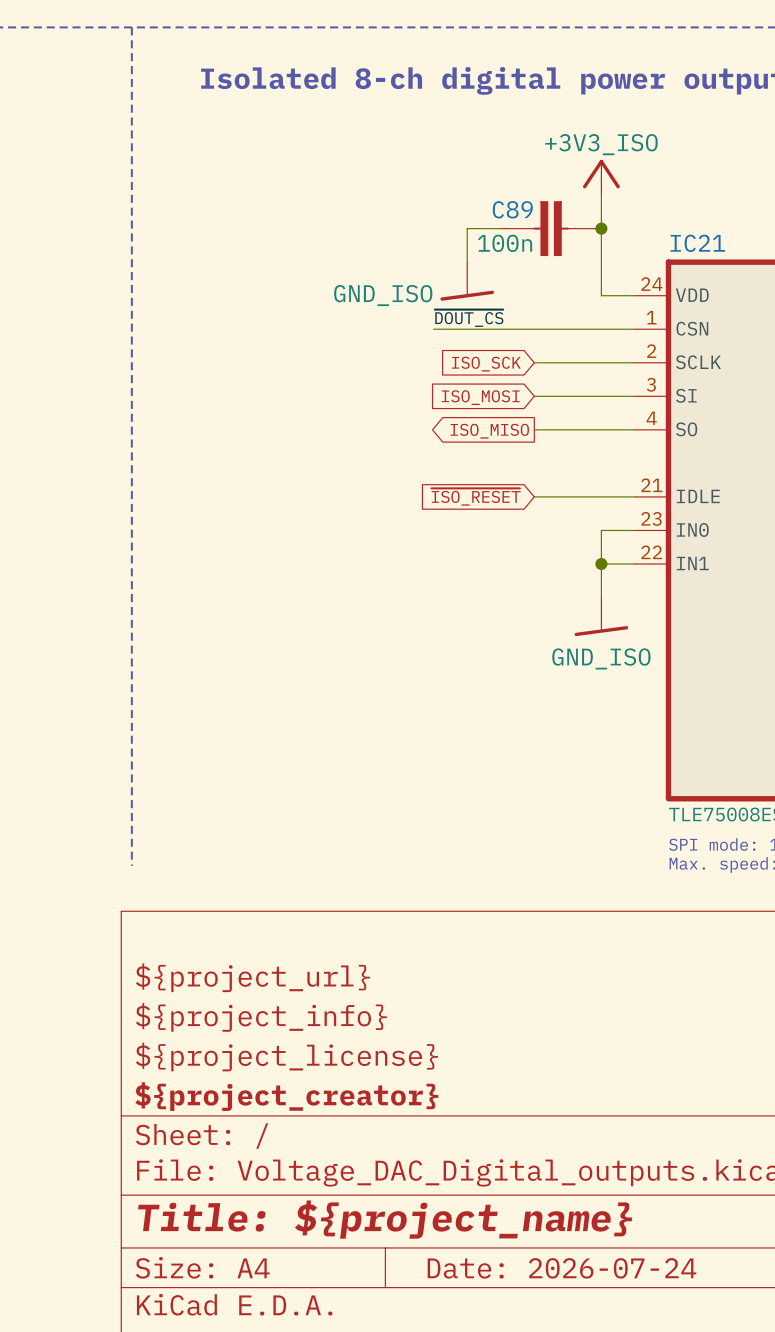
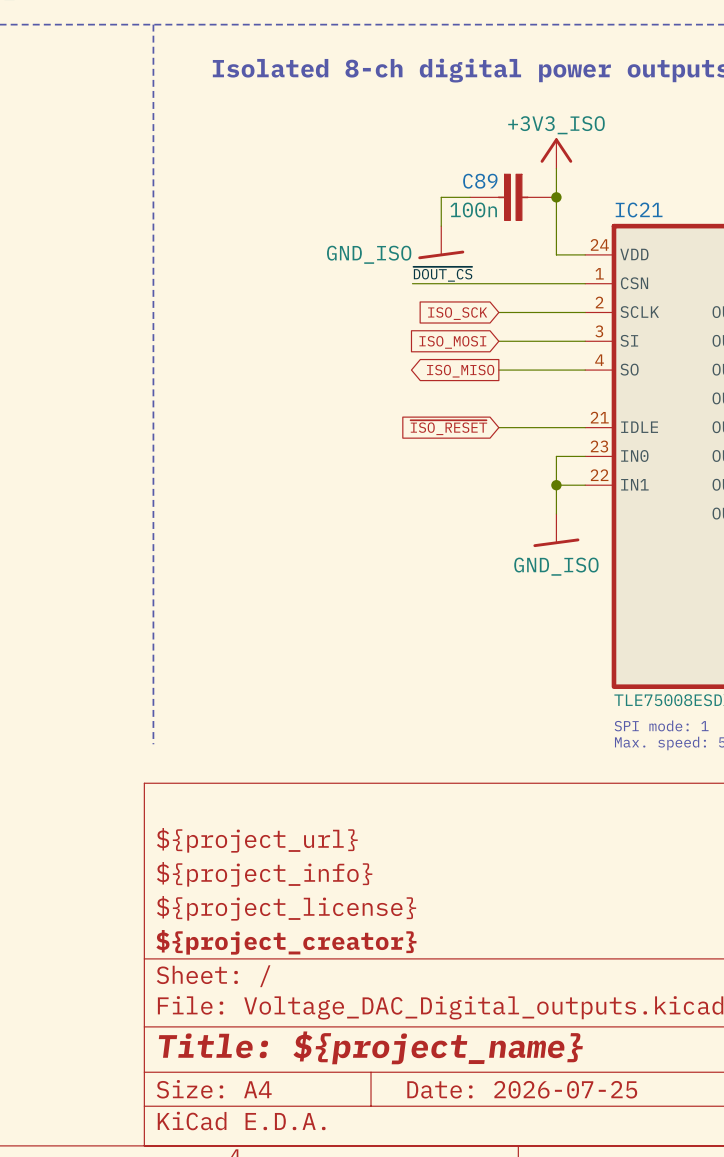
title block: Date: 2026-07-24 (562, 1268) -> Date: 2026-07-25 (522, 1089)

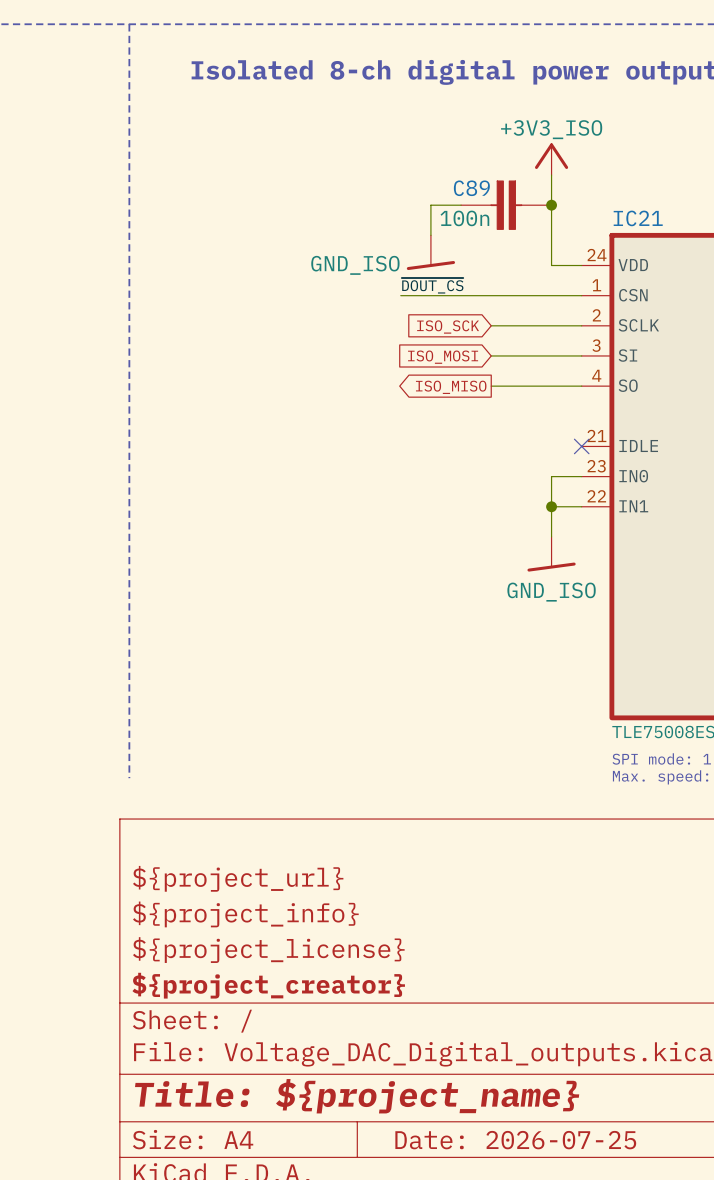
global label: ~{ISO_RESET} (448, 427) -> none
wire: (498, 427) (585, 427) -> none
no-connect mark: none -> (581, 446)

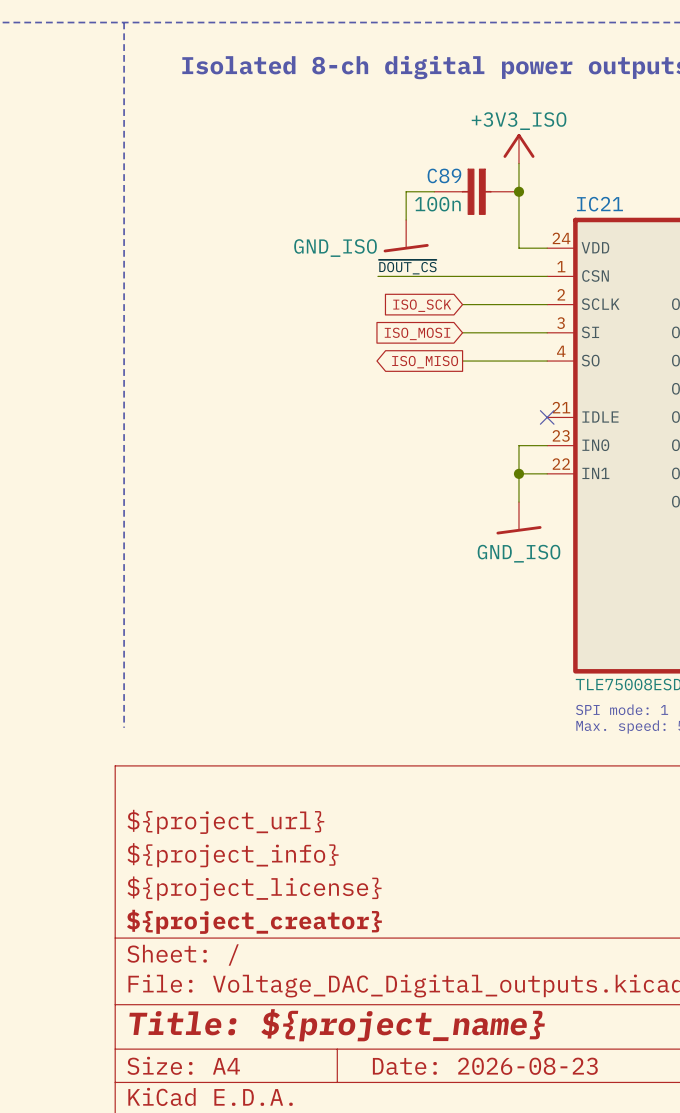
title block: Date: 2026-07-25 (515, 1140) -> Date: 2026-08-23 (485, 1066)

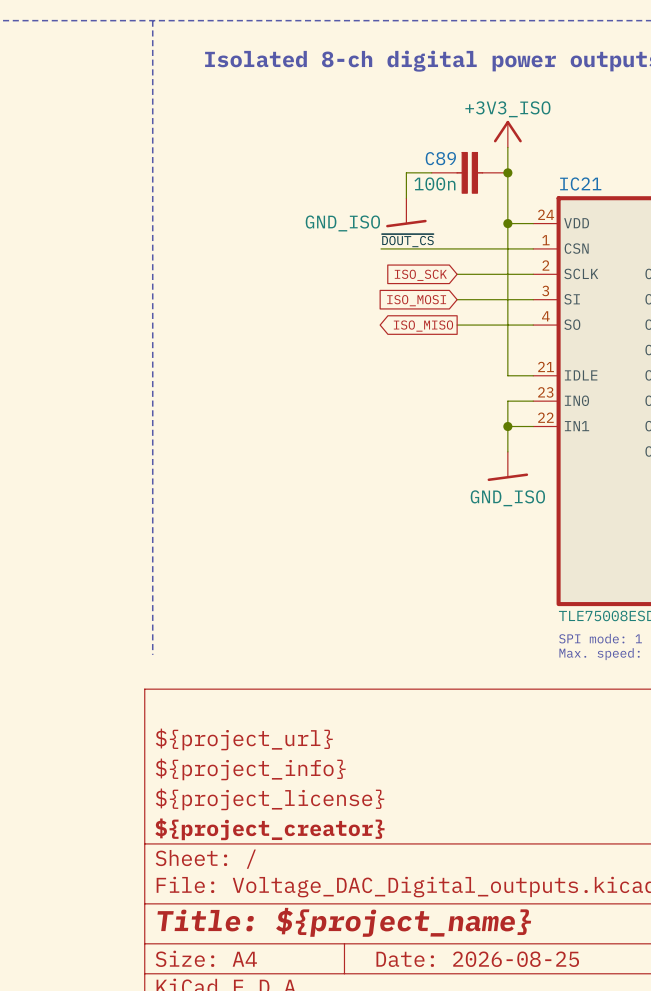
wire: none -> (507, 223) (507, 375) (533, 375)
junction: none -> (507, 223)
no-connect mark: (547, 417) -> none
title block: Date: 2026-08-23 (485, 1066) -> Date: 2026-08-25 (477, 959)

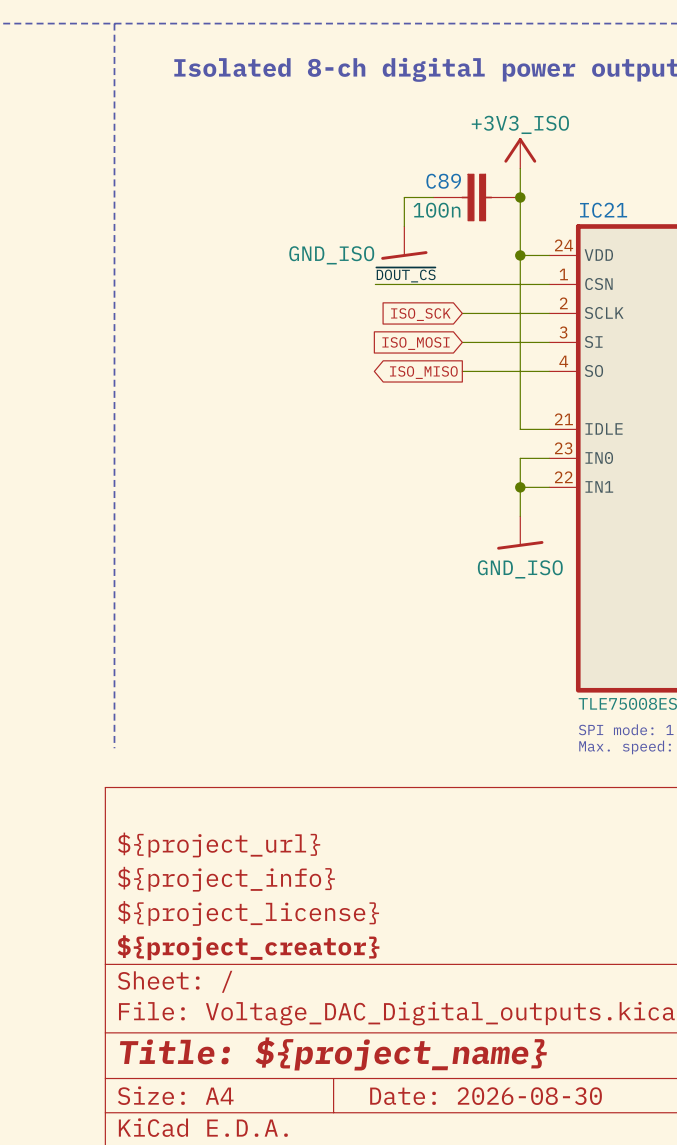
title block: Date: 2026-08-25 (477, 959) -> Date: 2026-08-30 (486, 1096)

